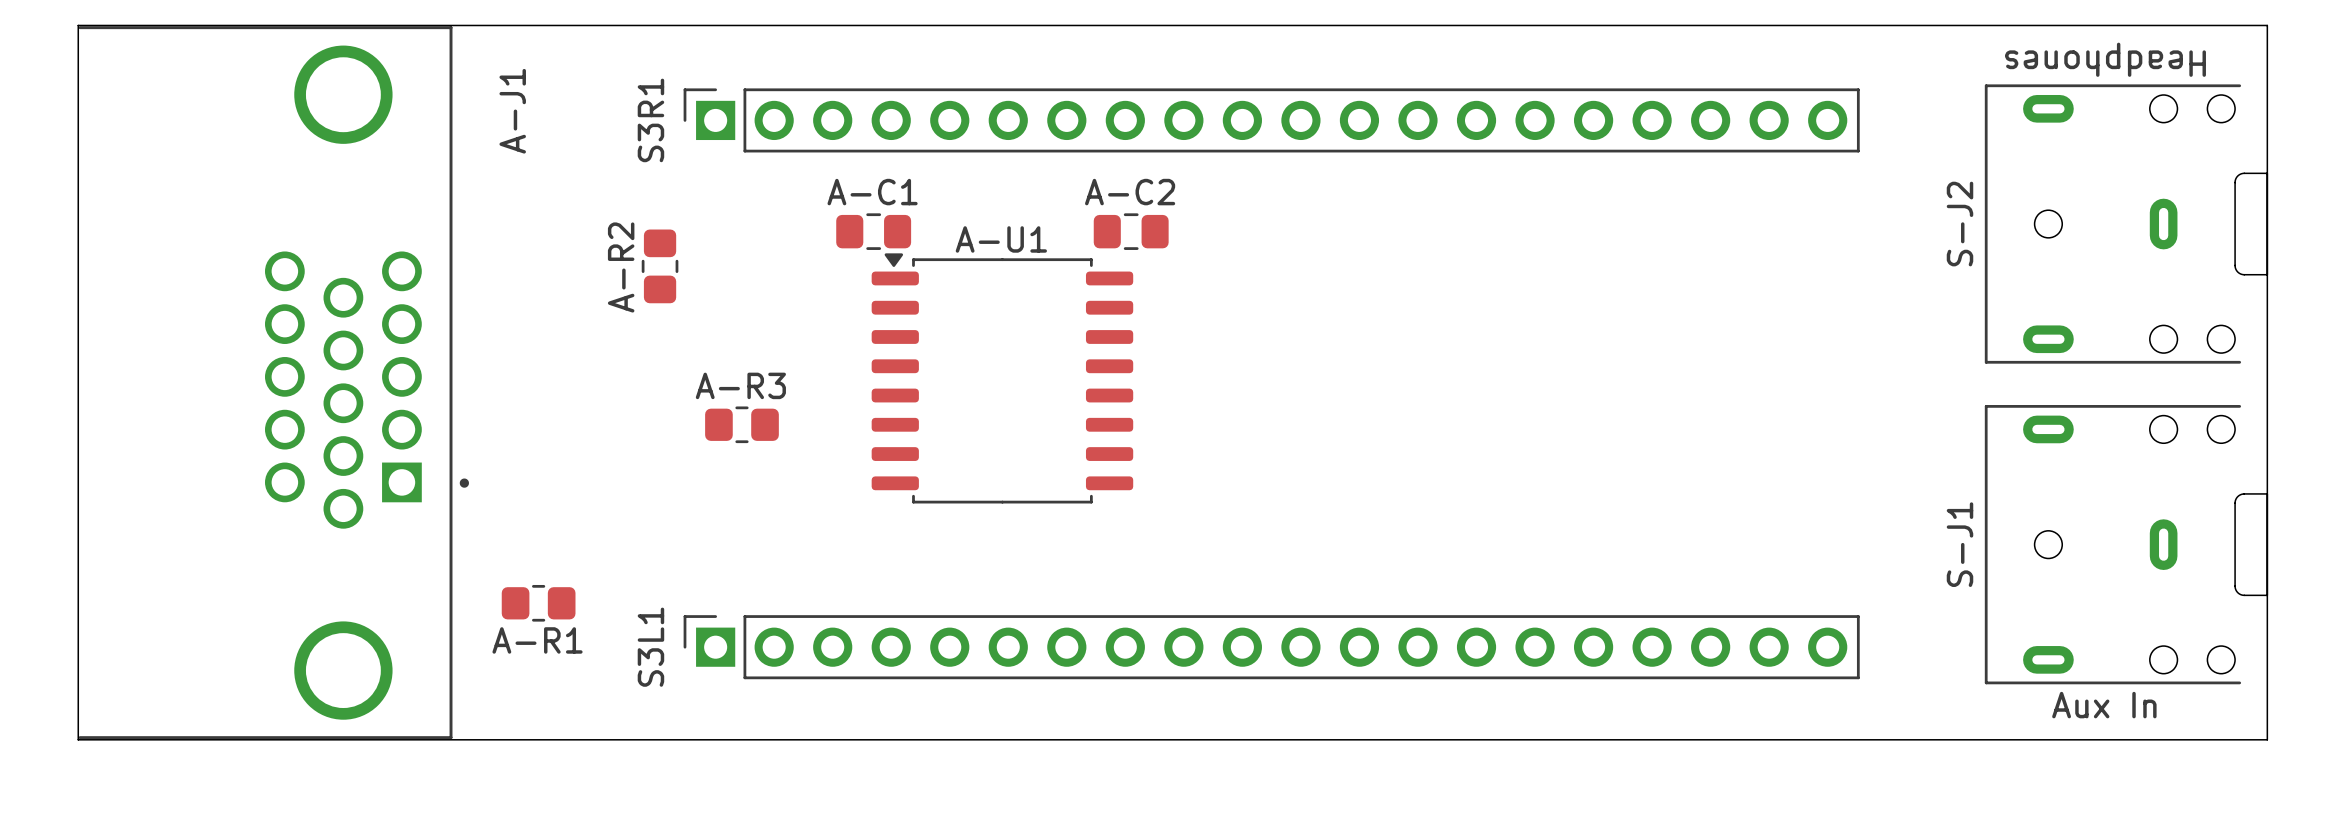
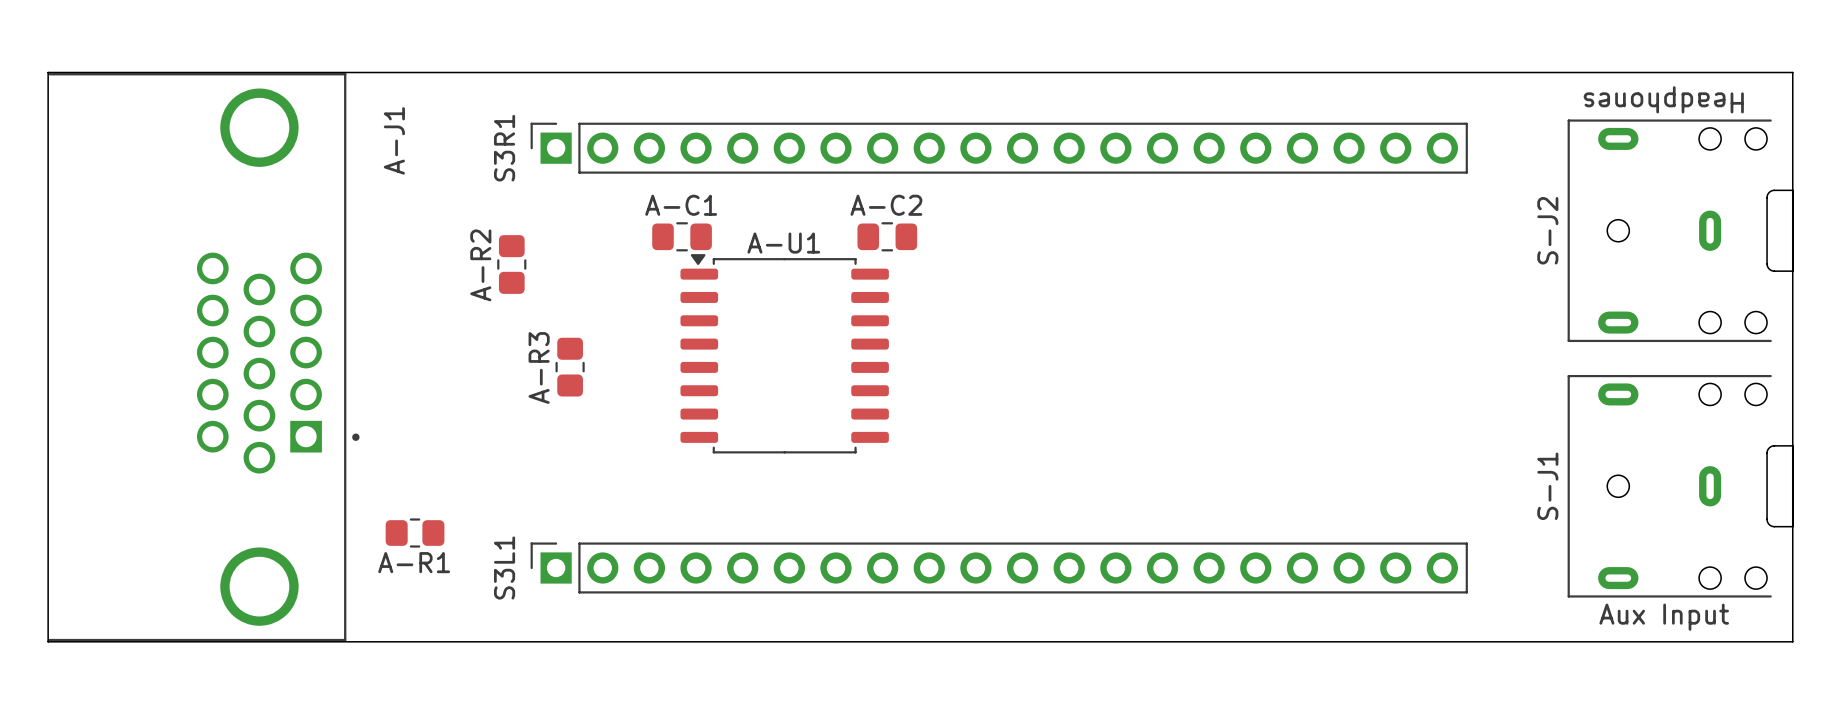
A-R3 name position: A-R3 (740, 385) -> A-R3 (539, 368)
A-R3 rotation: 0° (741, 424) -> 90° clockwise (570, 367)
S-J1 value: Aux In (2104, 705) -> Aux Input (1664, 617)

